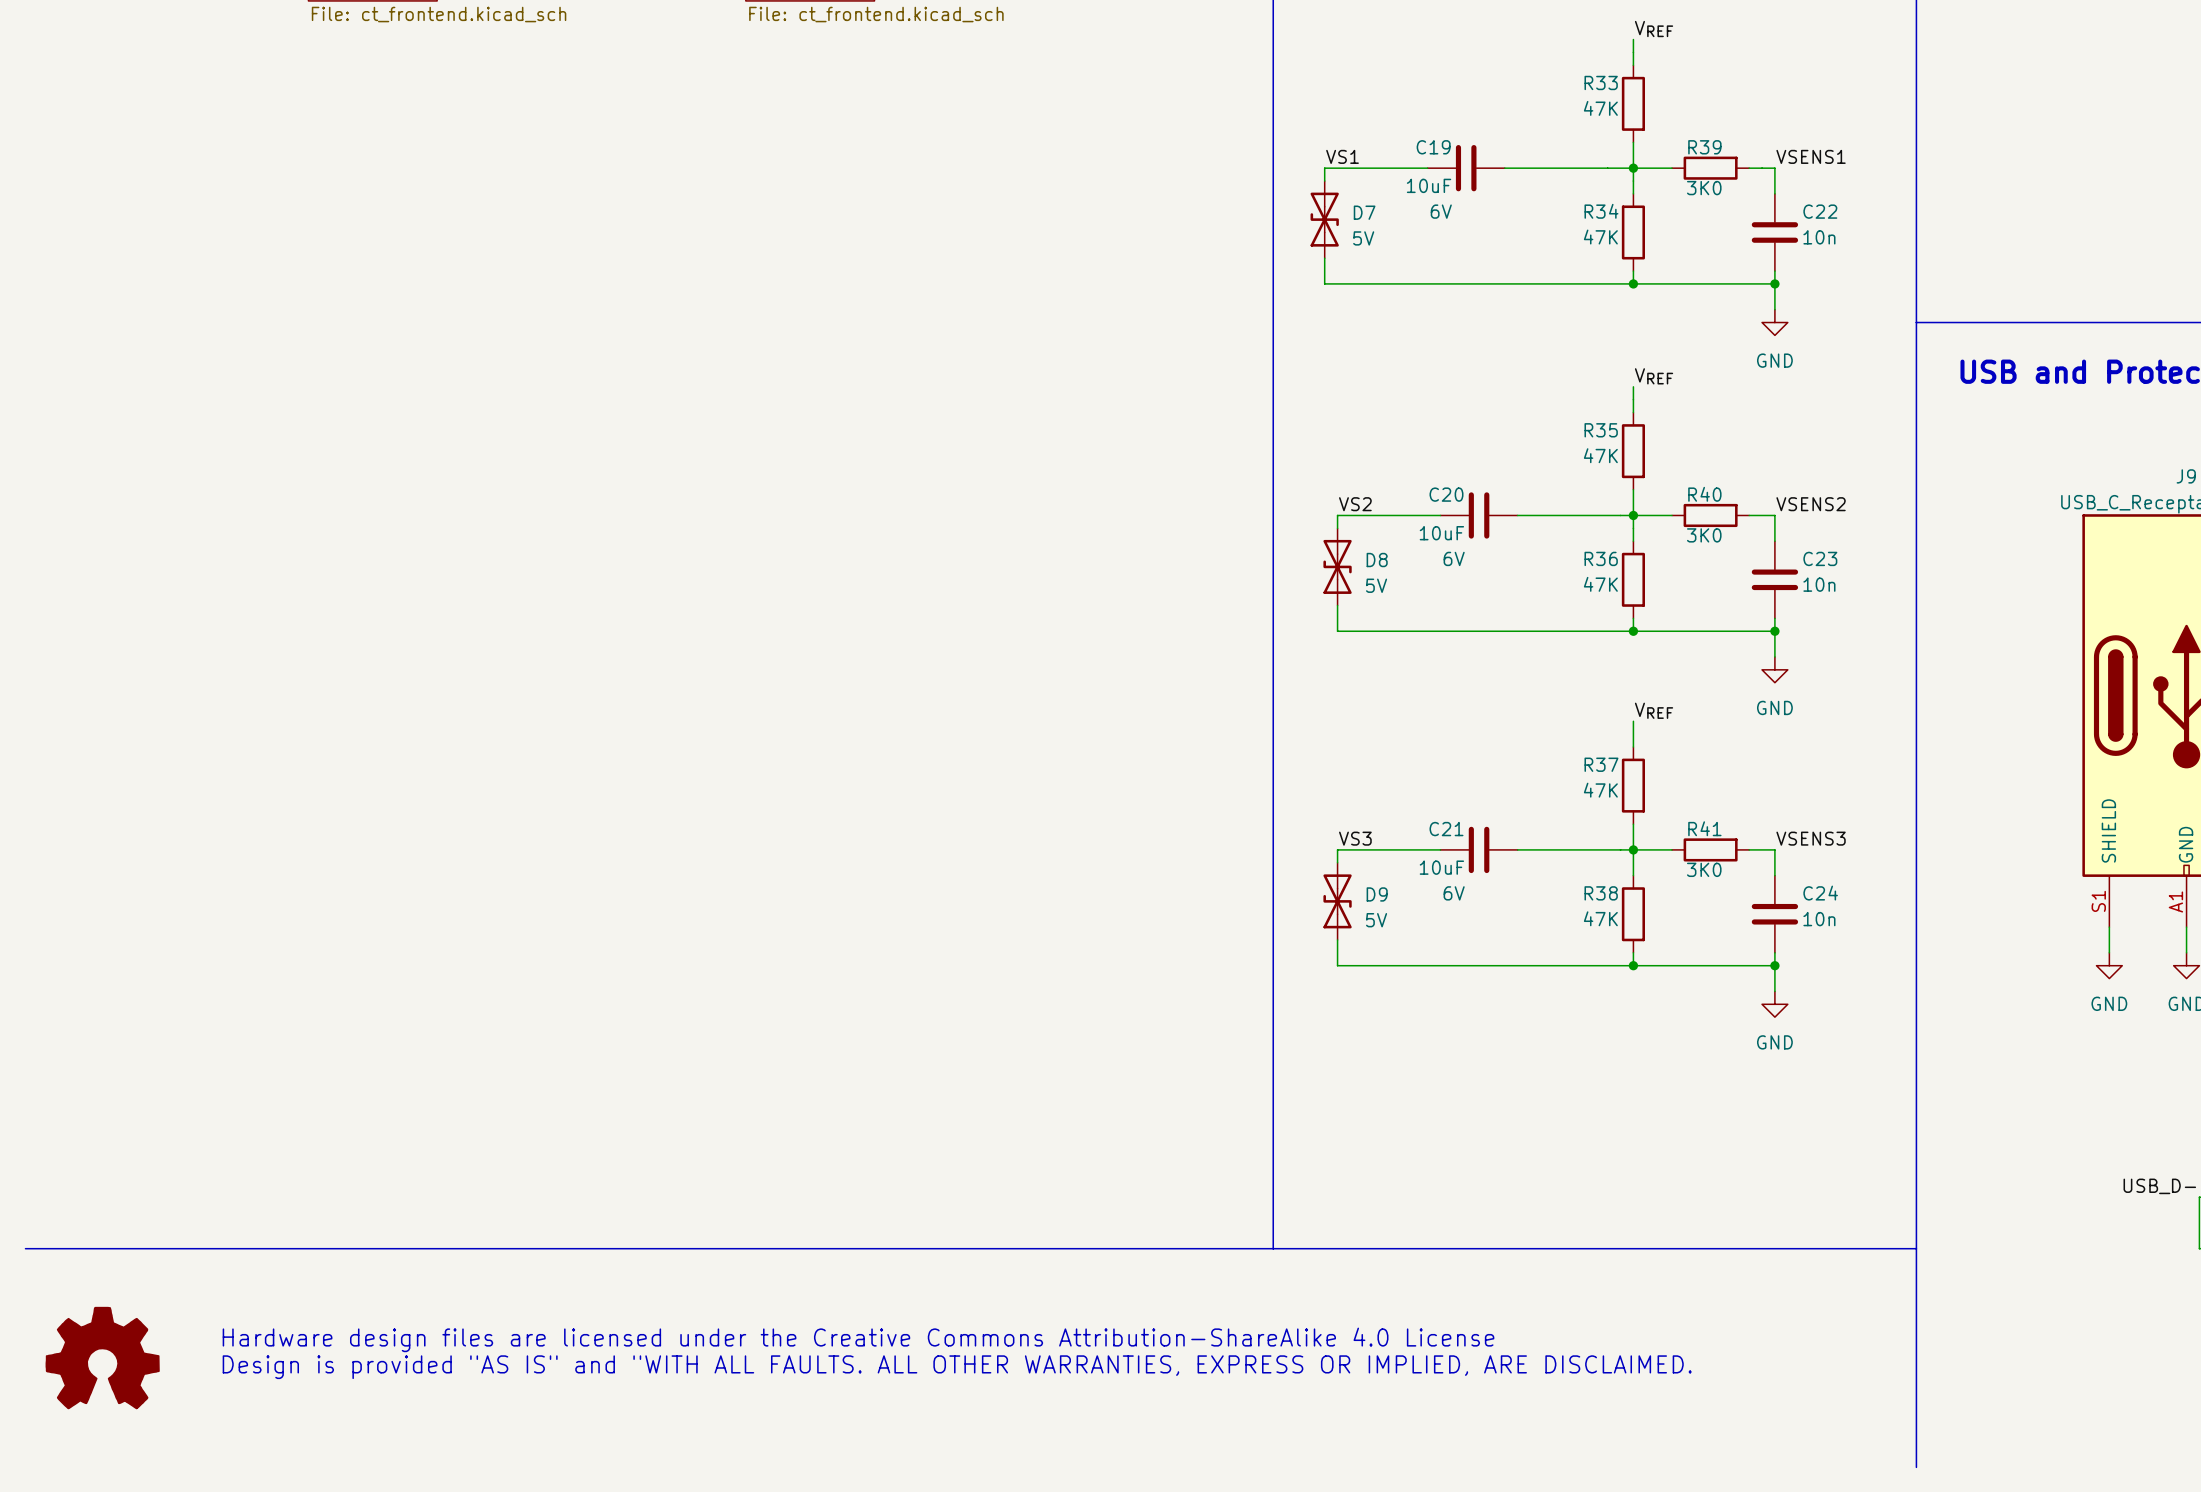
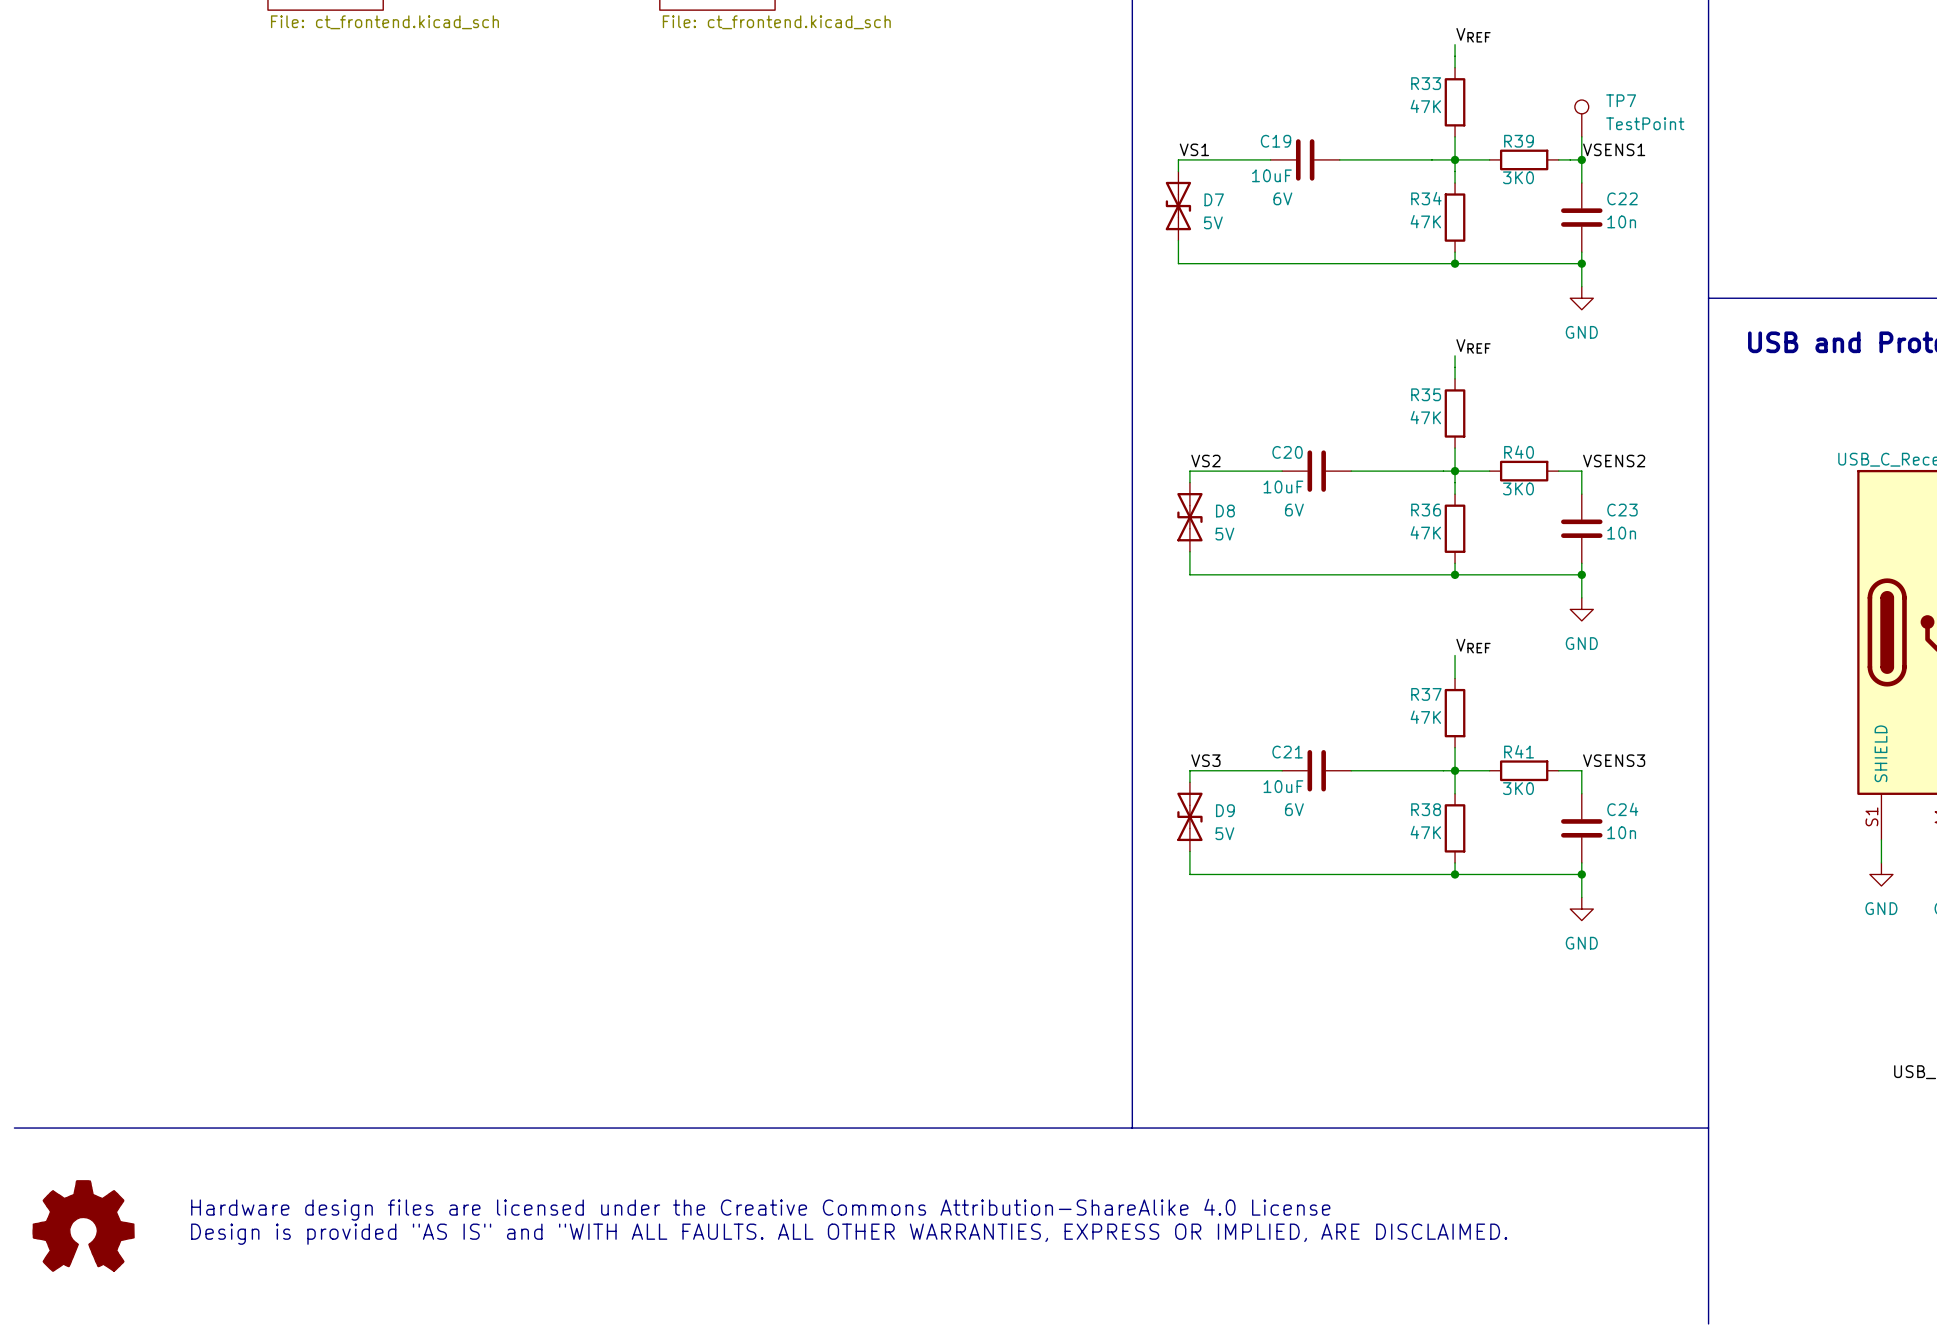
TP7: none -> TestPoint (1581, 118)
wire: none -> (1581, 136) (1581, 159)
junction: none -> (1581, 159)

